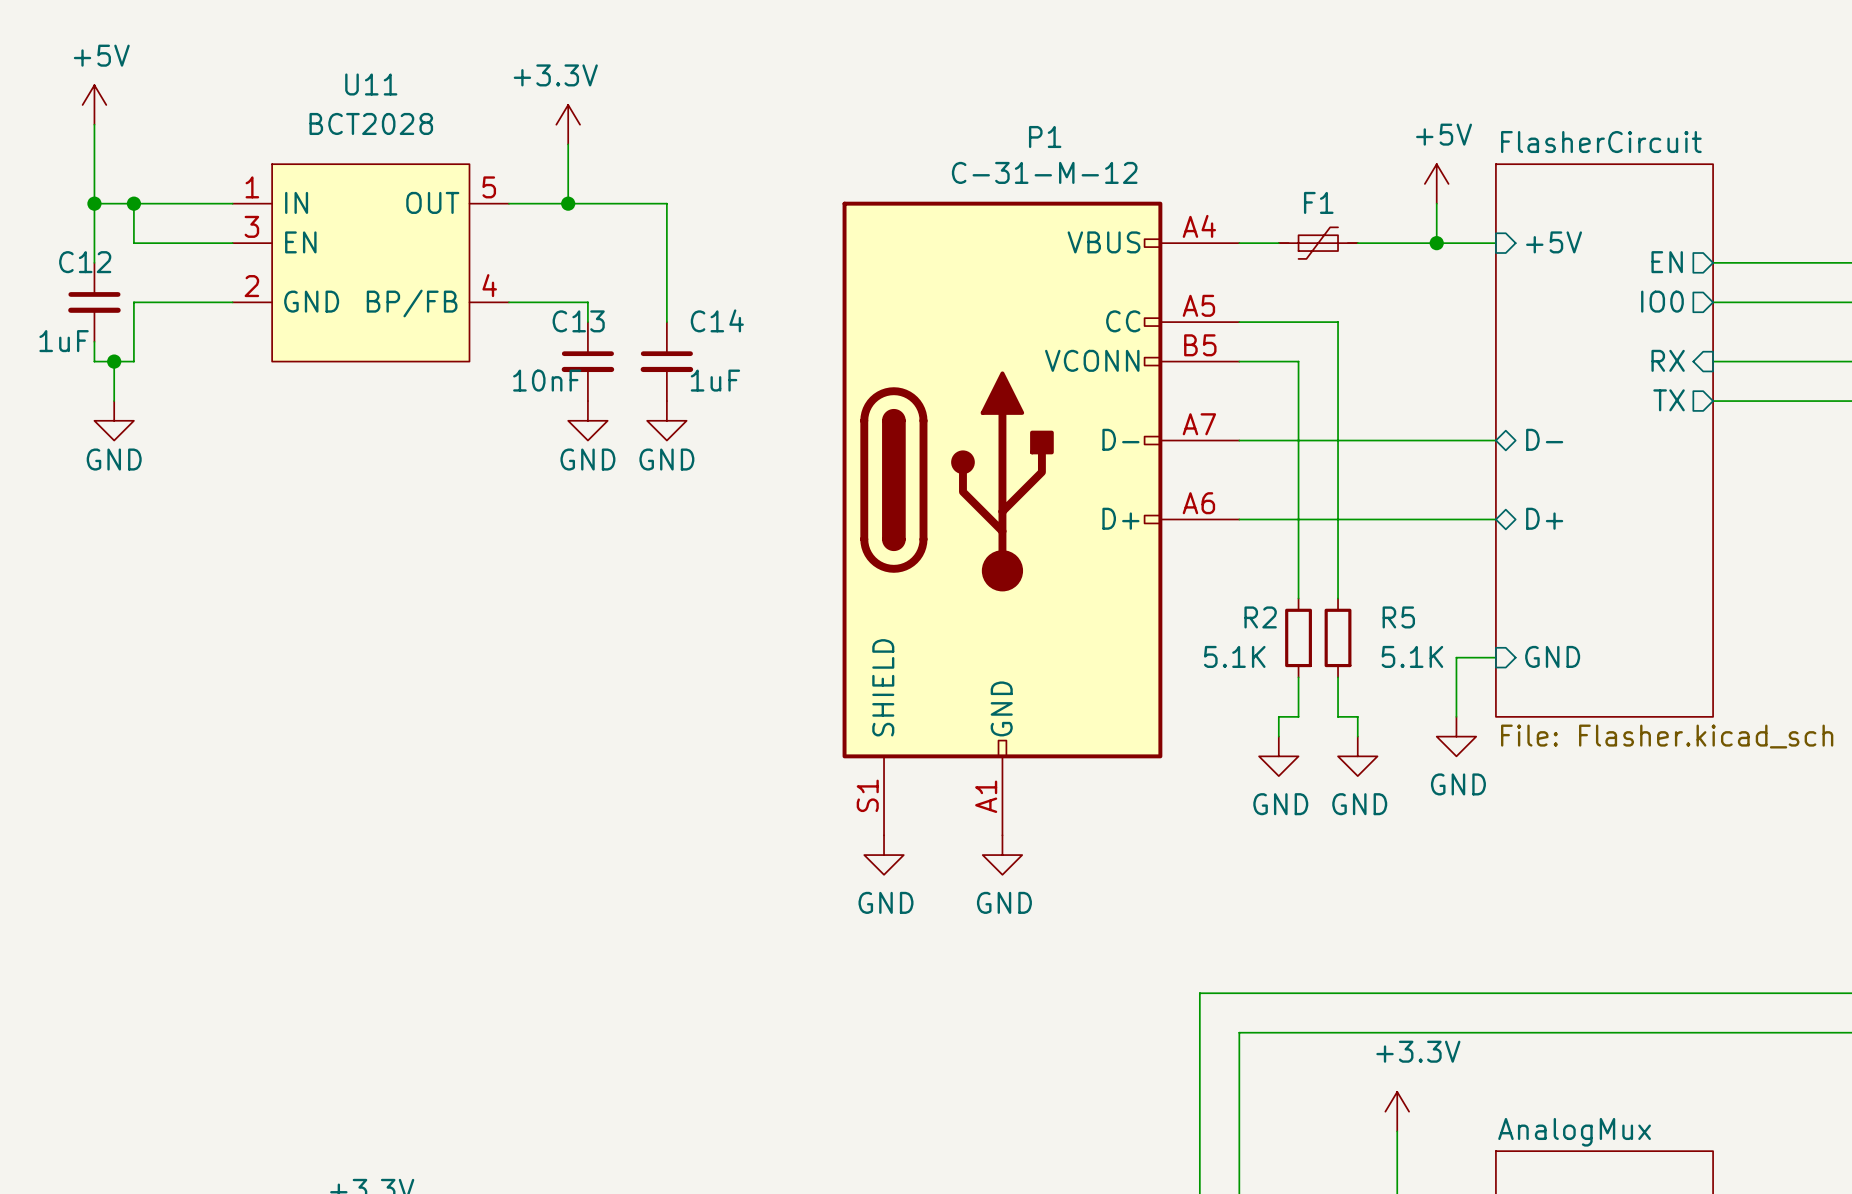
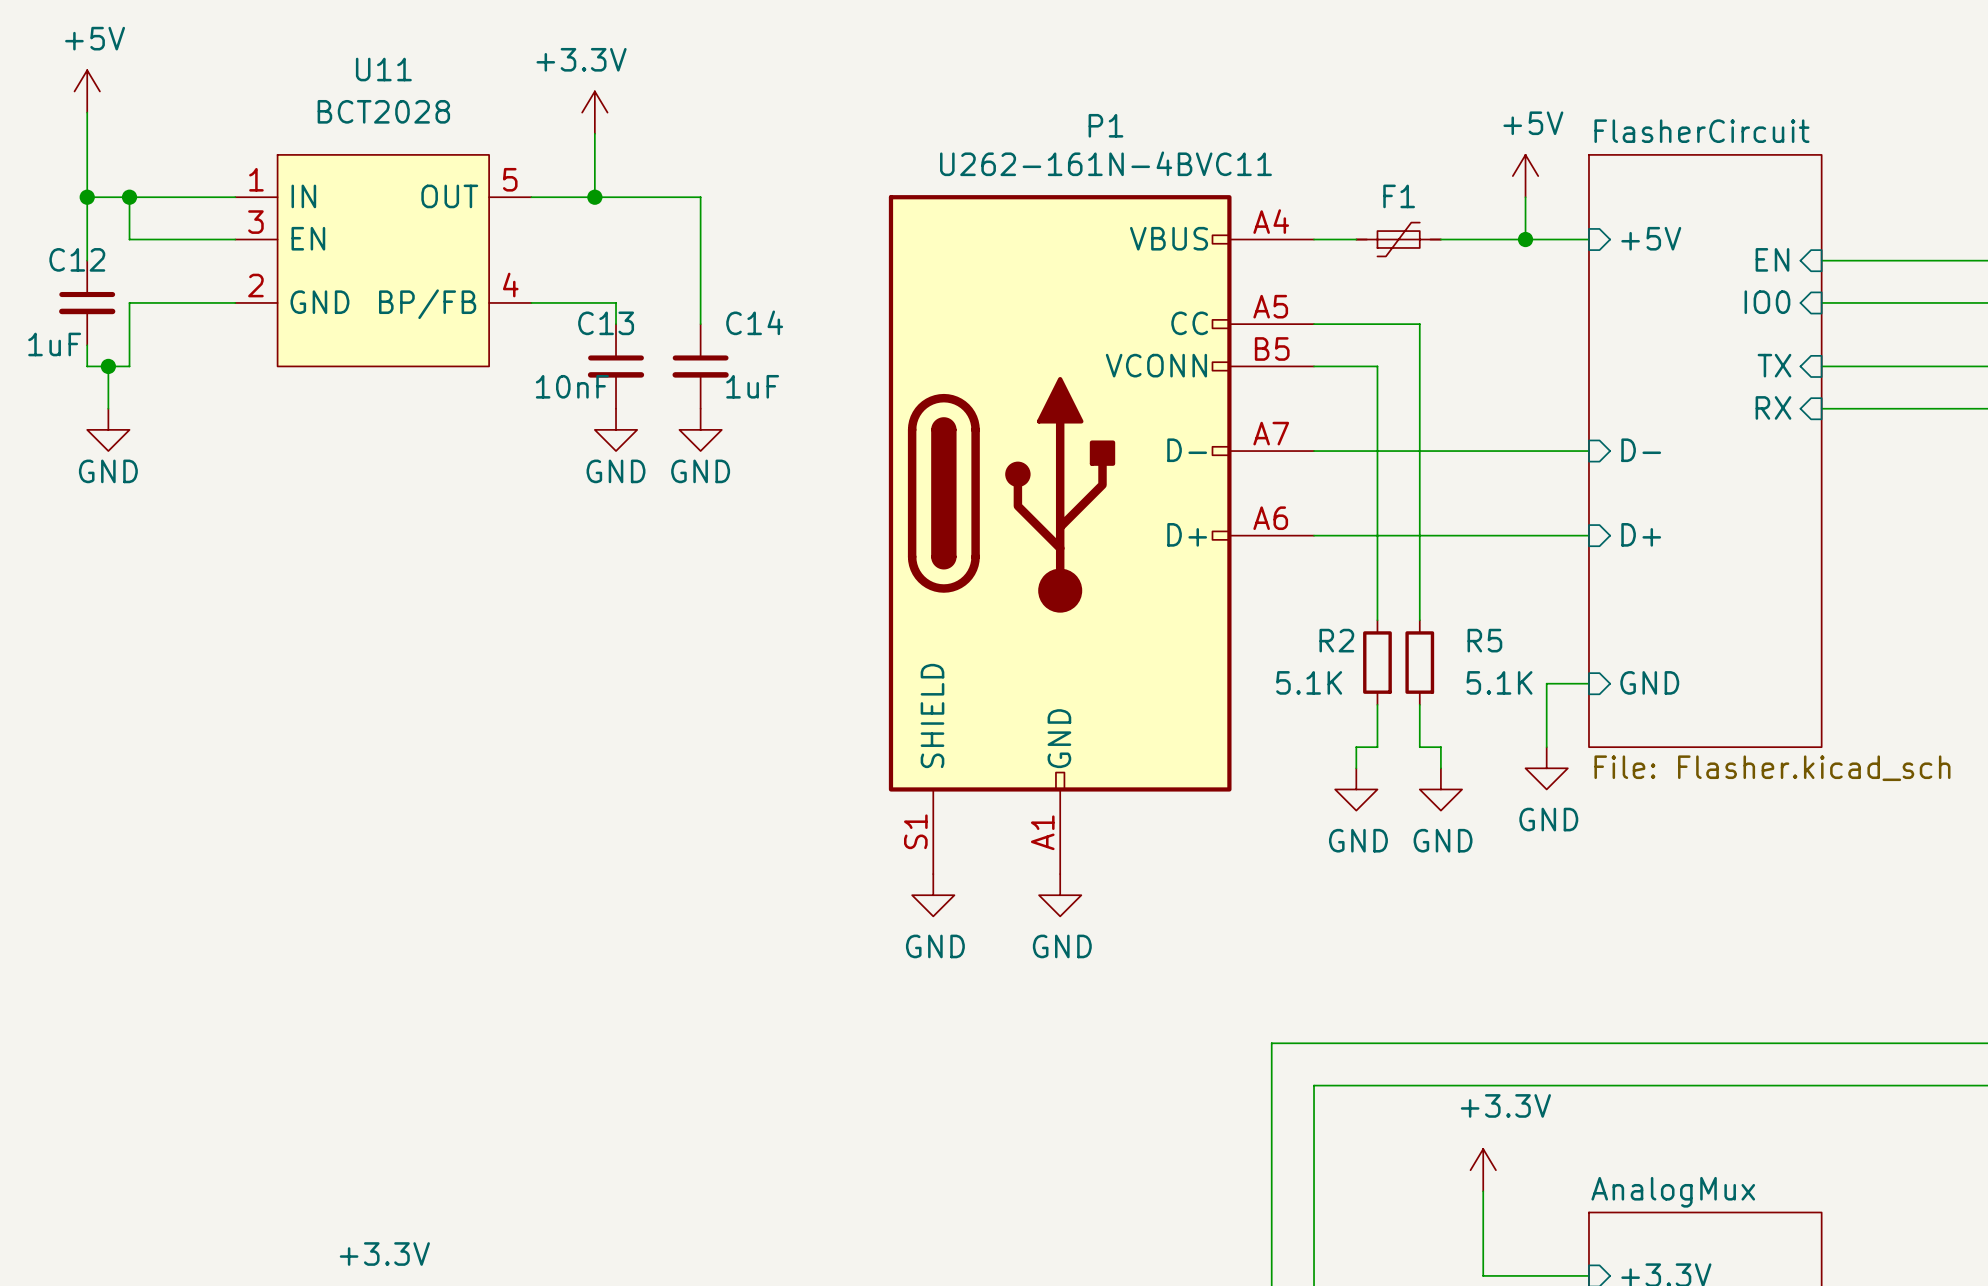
P1 value: C-31-M-12 (1044, 172) -> U262-161N-4BVC11 (1105, 163)
sheet pin shape: output (1667, 262) -> input (1772, 259)
sheet pin shape: output (1662, 301) -> input (1767, 302)
sheet pin: RX (1668, 360) -> TX (1774, 365)
sheet pin shape: output (1669, 400) -> input (1773, 407)
sheet pin: TX (1669, 400) -> RX (1773, 407)
sheet pin shape: bidirectional (1544, 439) -> input (1641, 450)
sheet pin shape: bidirectional (1544, 518) -> input (1641, 534)

